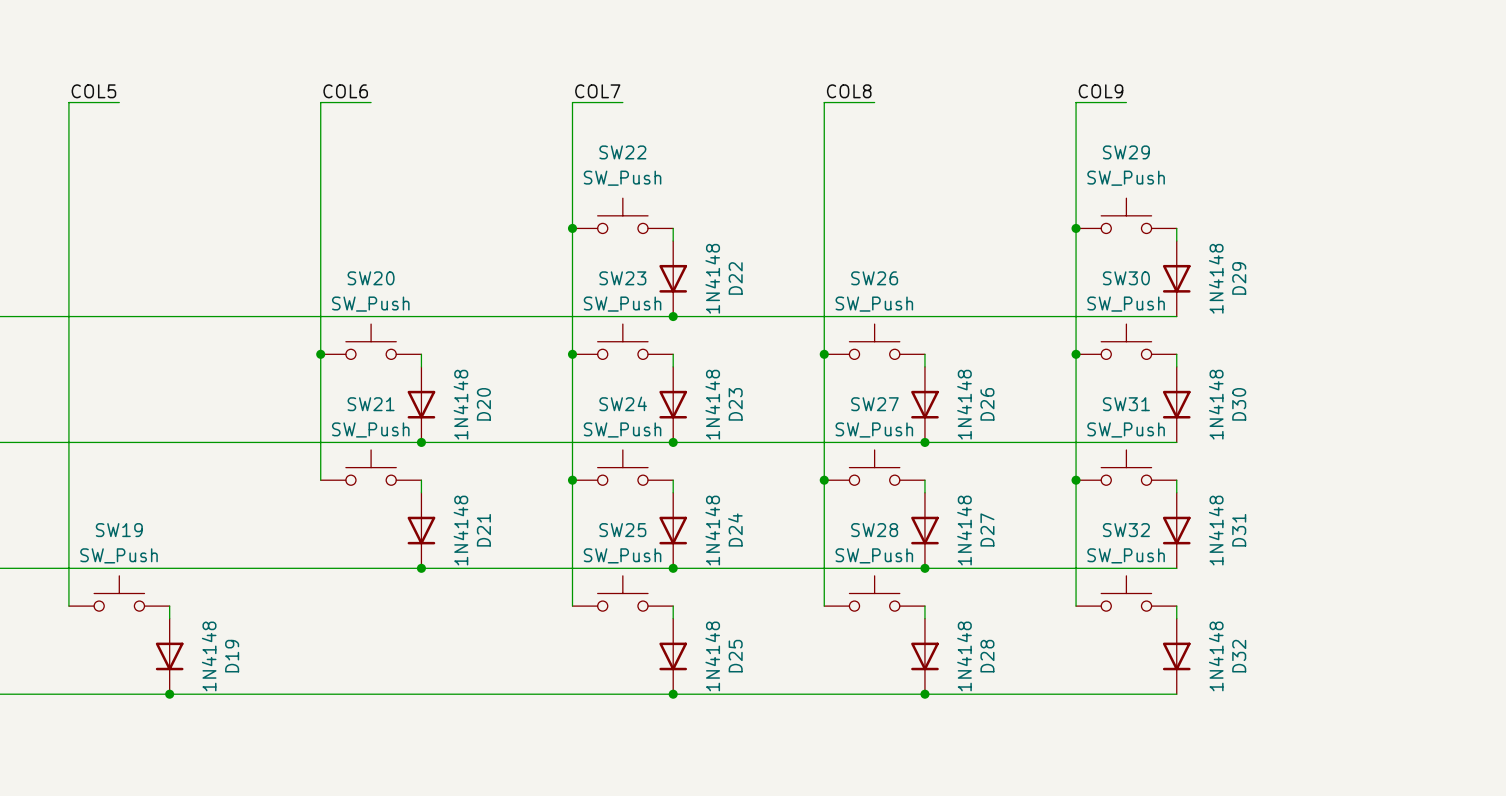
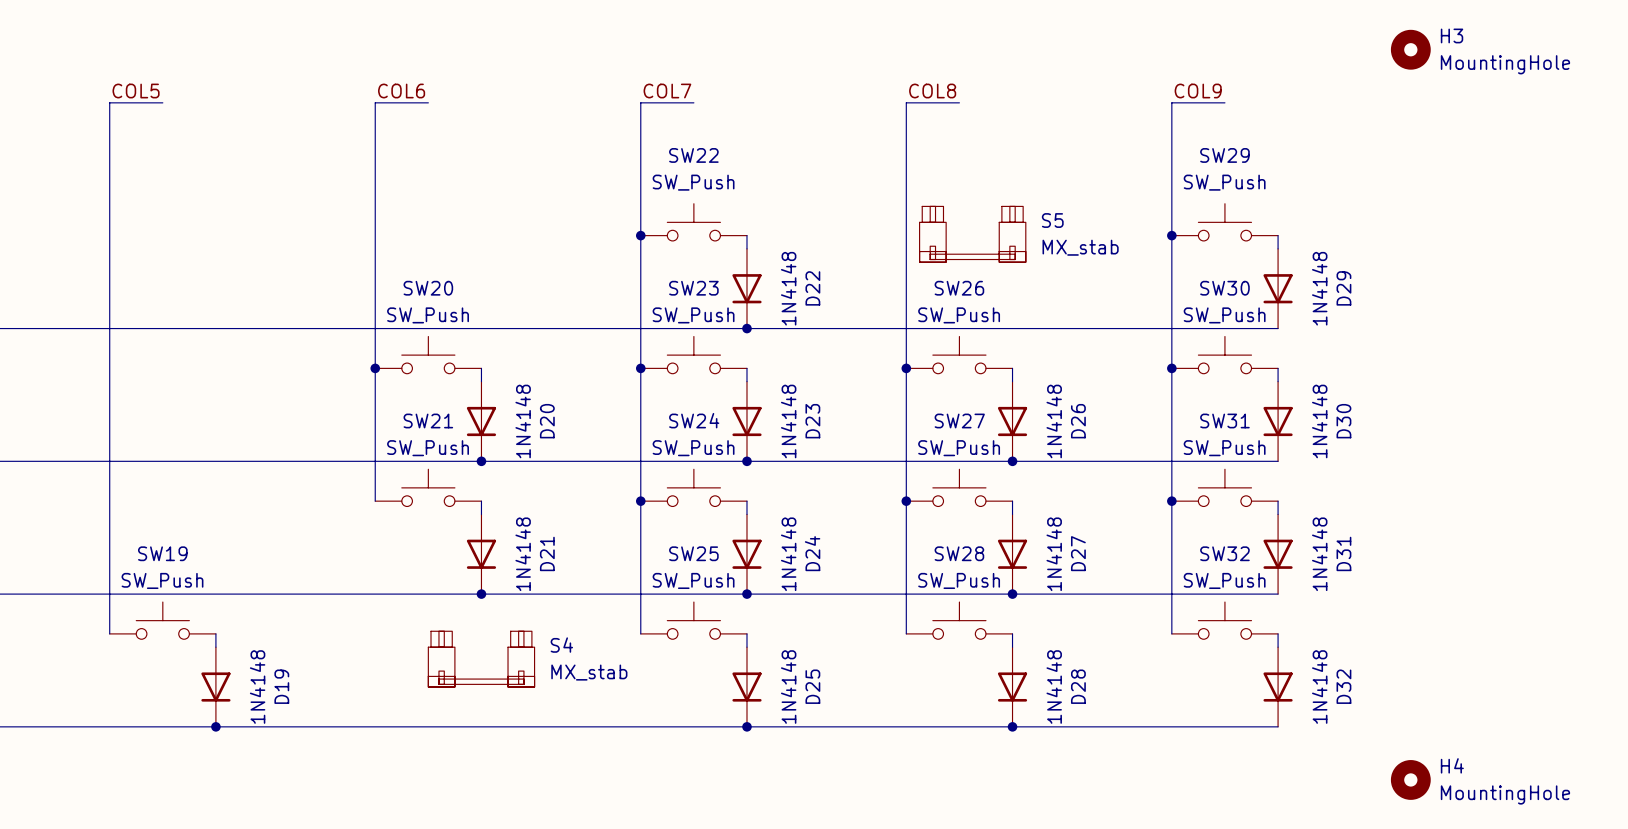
H3: none -> MountingHole (1410, 49)
S5: none -> MX_stab (972, 234)
S4: none -> MX_stab (481, 659)
H4: none -> MountingHole (1410, 779)

